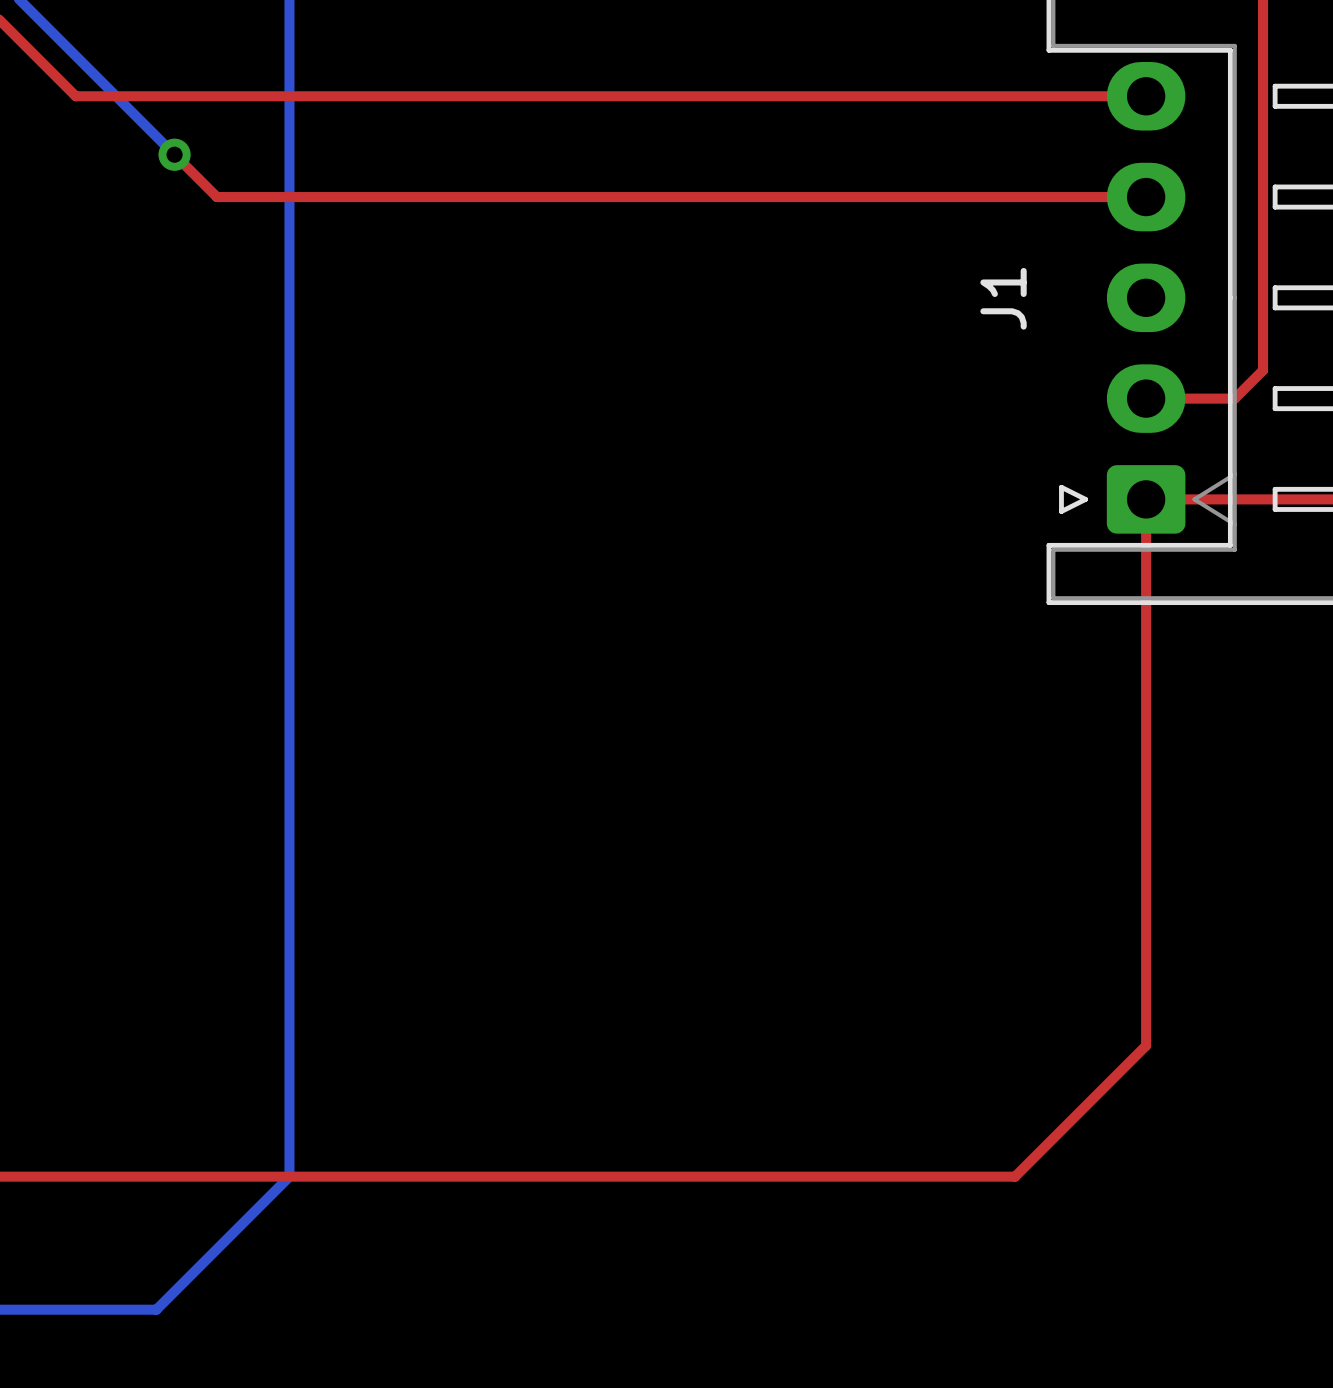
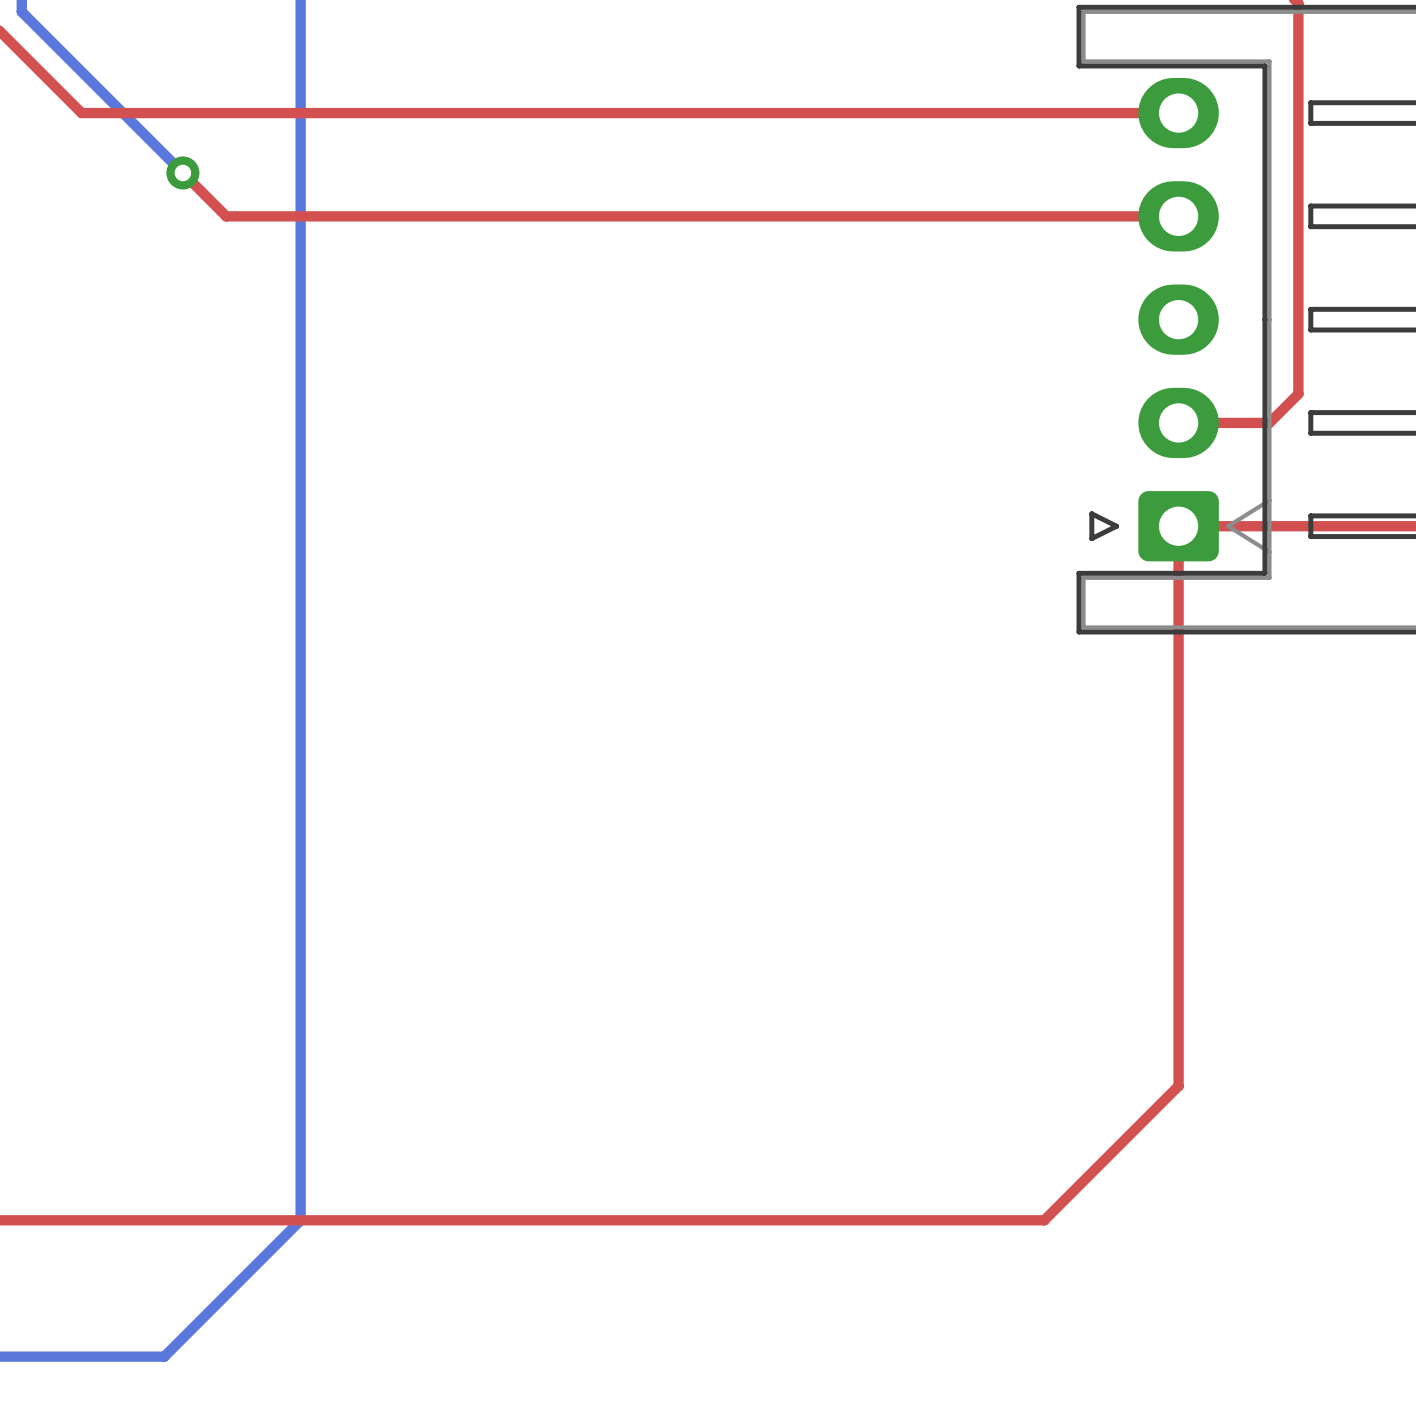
J1 name: J1 (1003, 298) -> none

